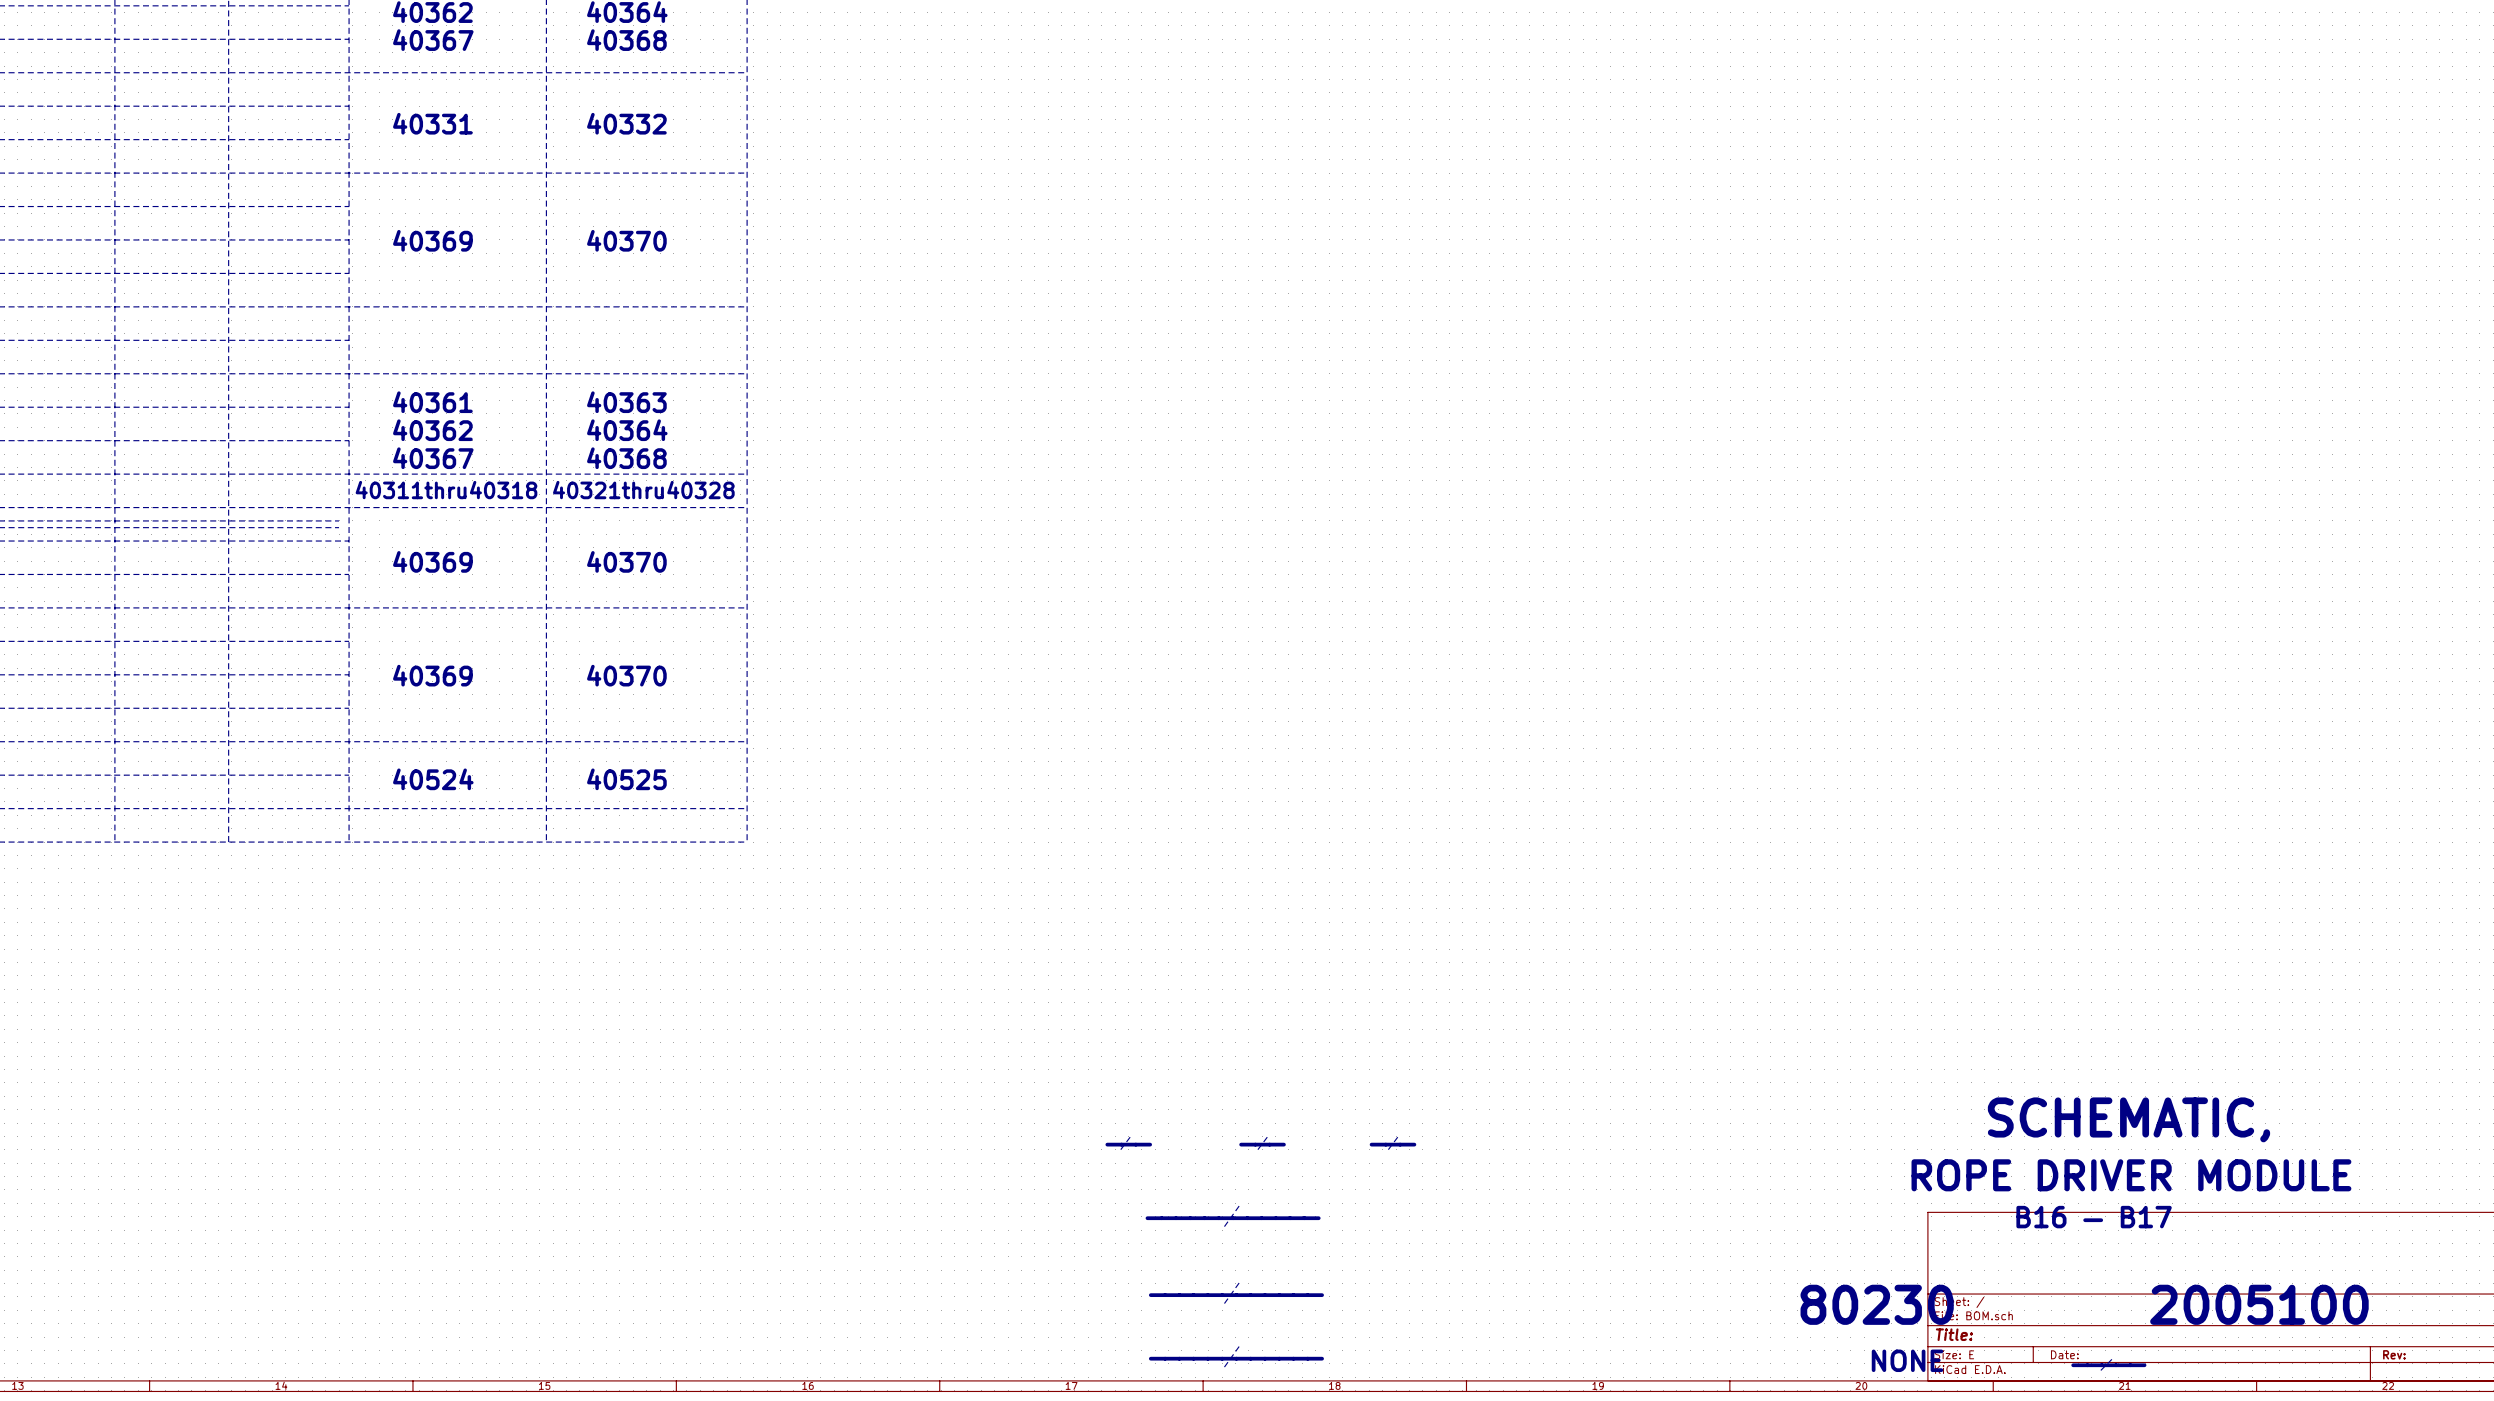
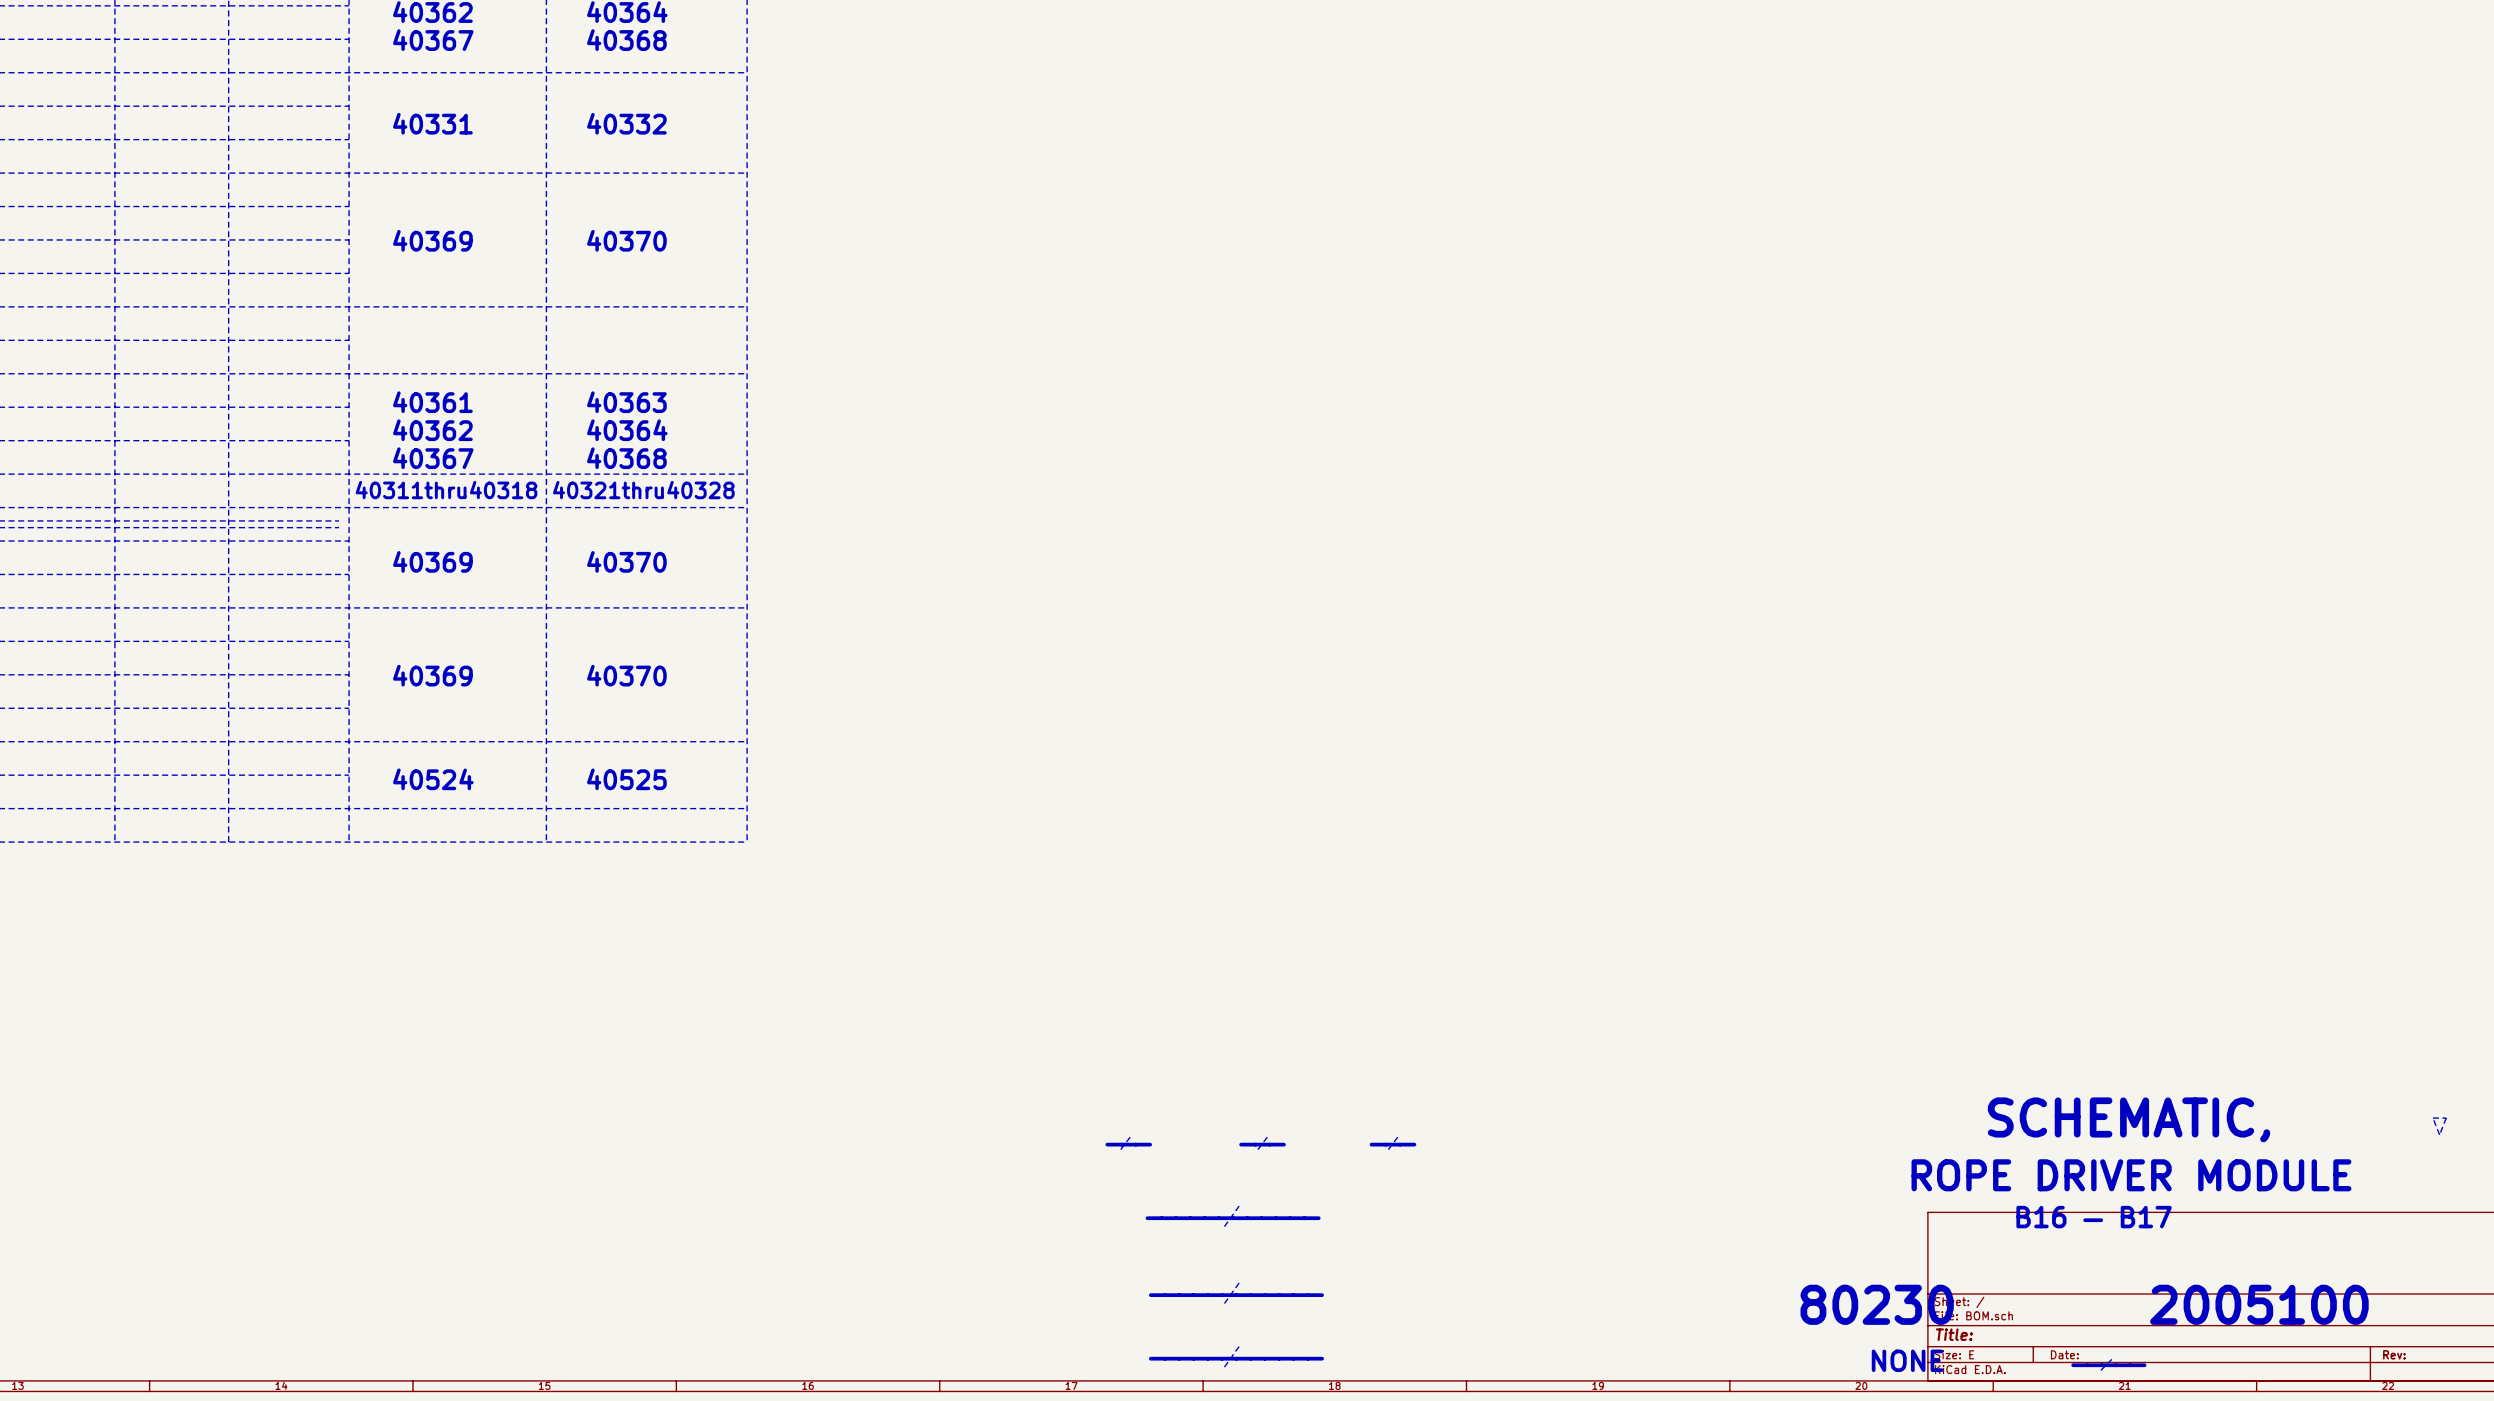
line: none -> (2432, 1118) (2439, 1134) (2446, 1118) (2432, 1118)

